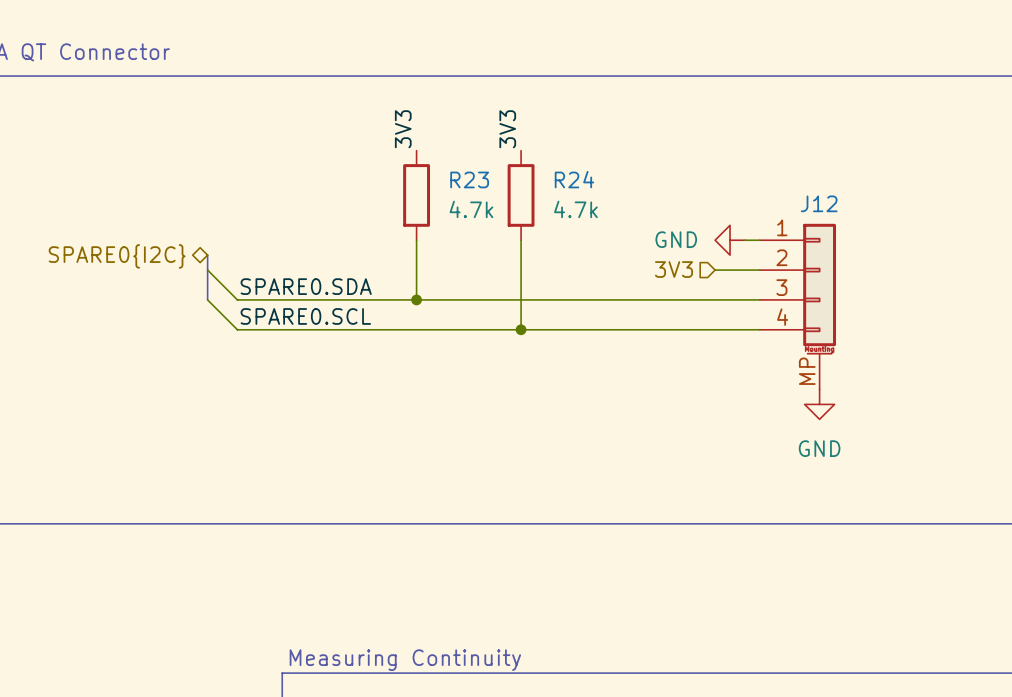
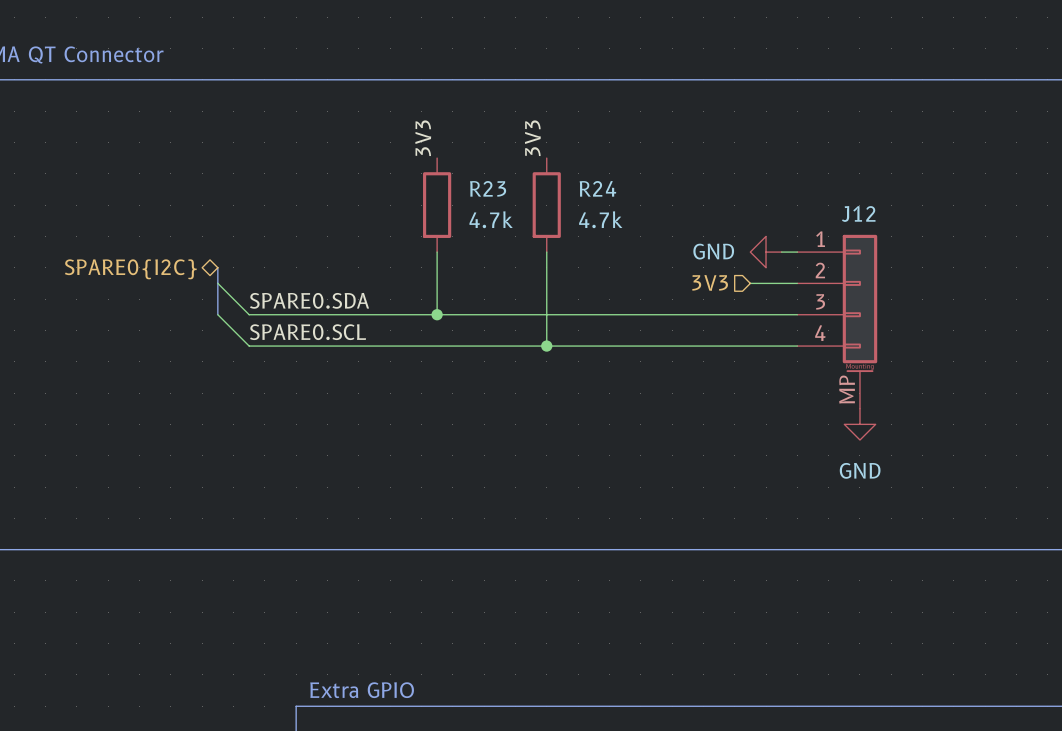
text: none -> Extra GPIO (362, 690)
text: Measuring Continuity (405, 660) -> none

